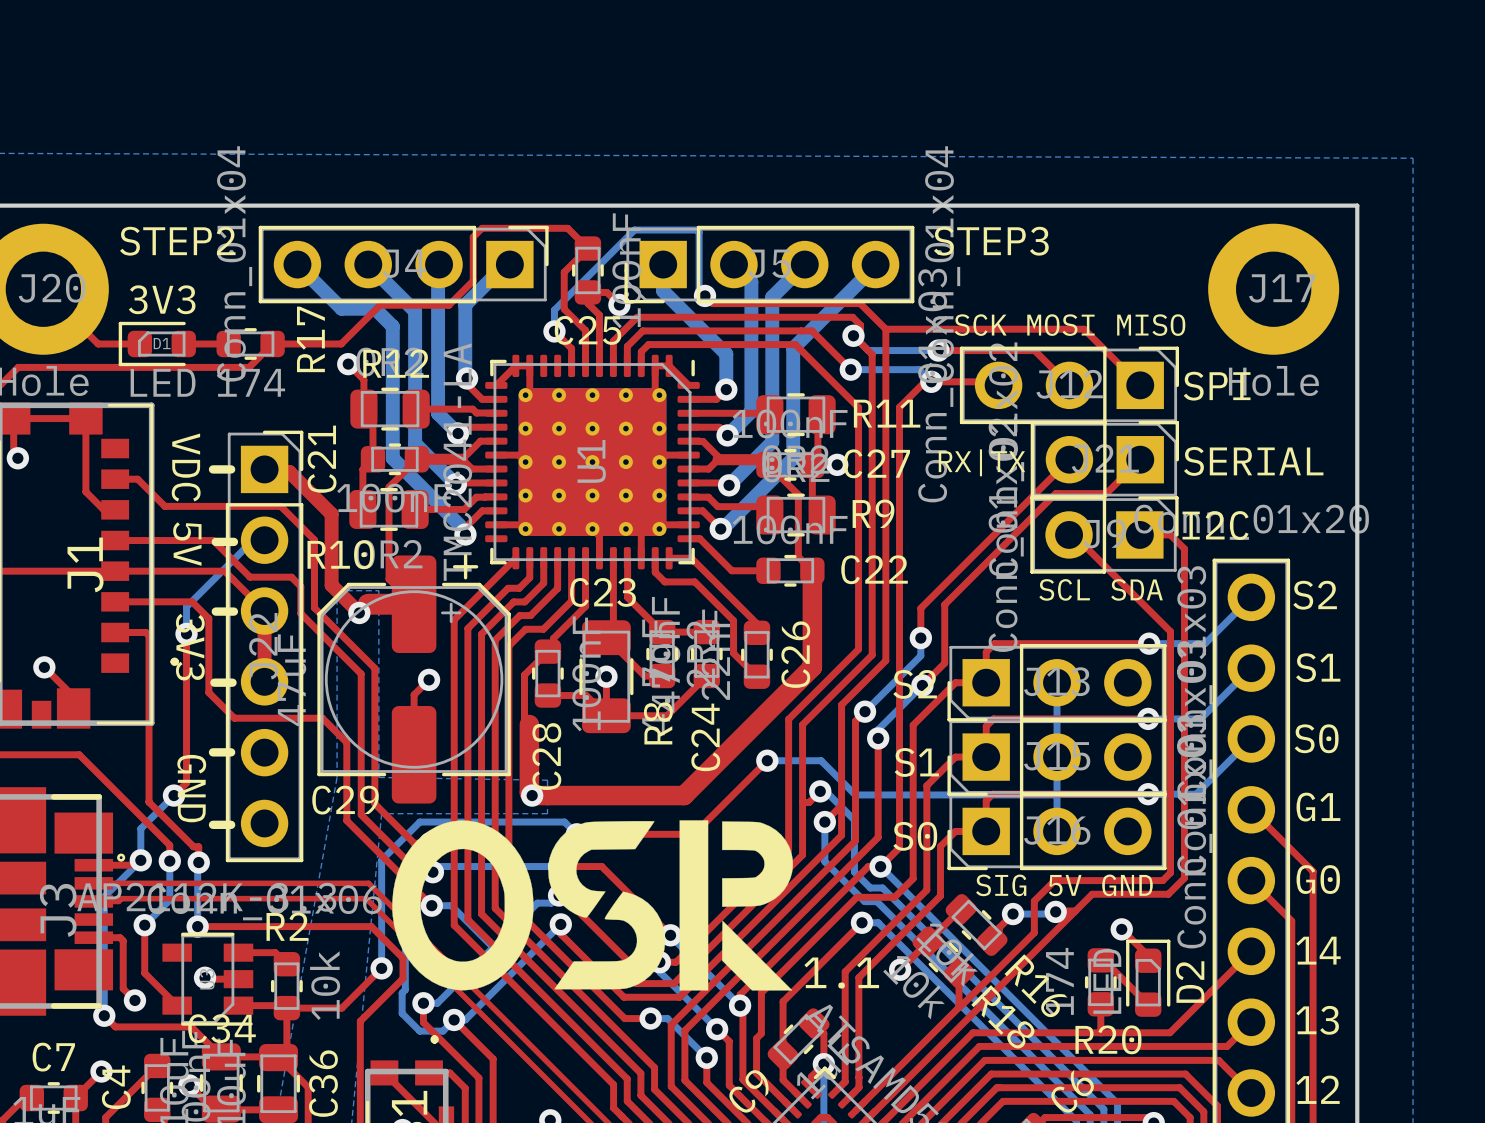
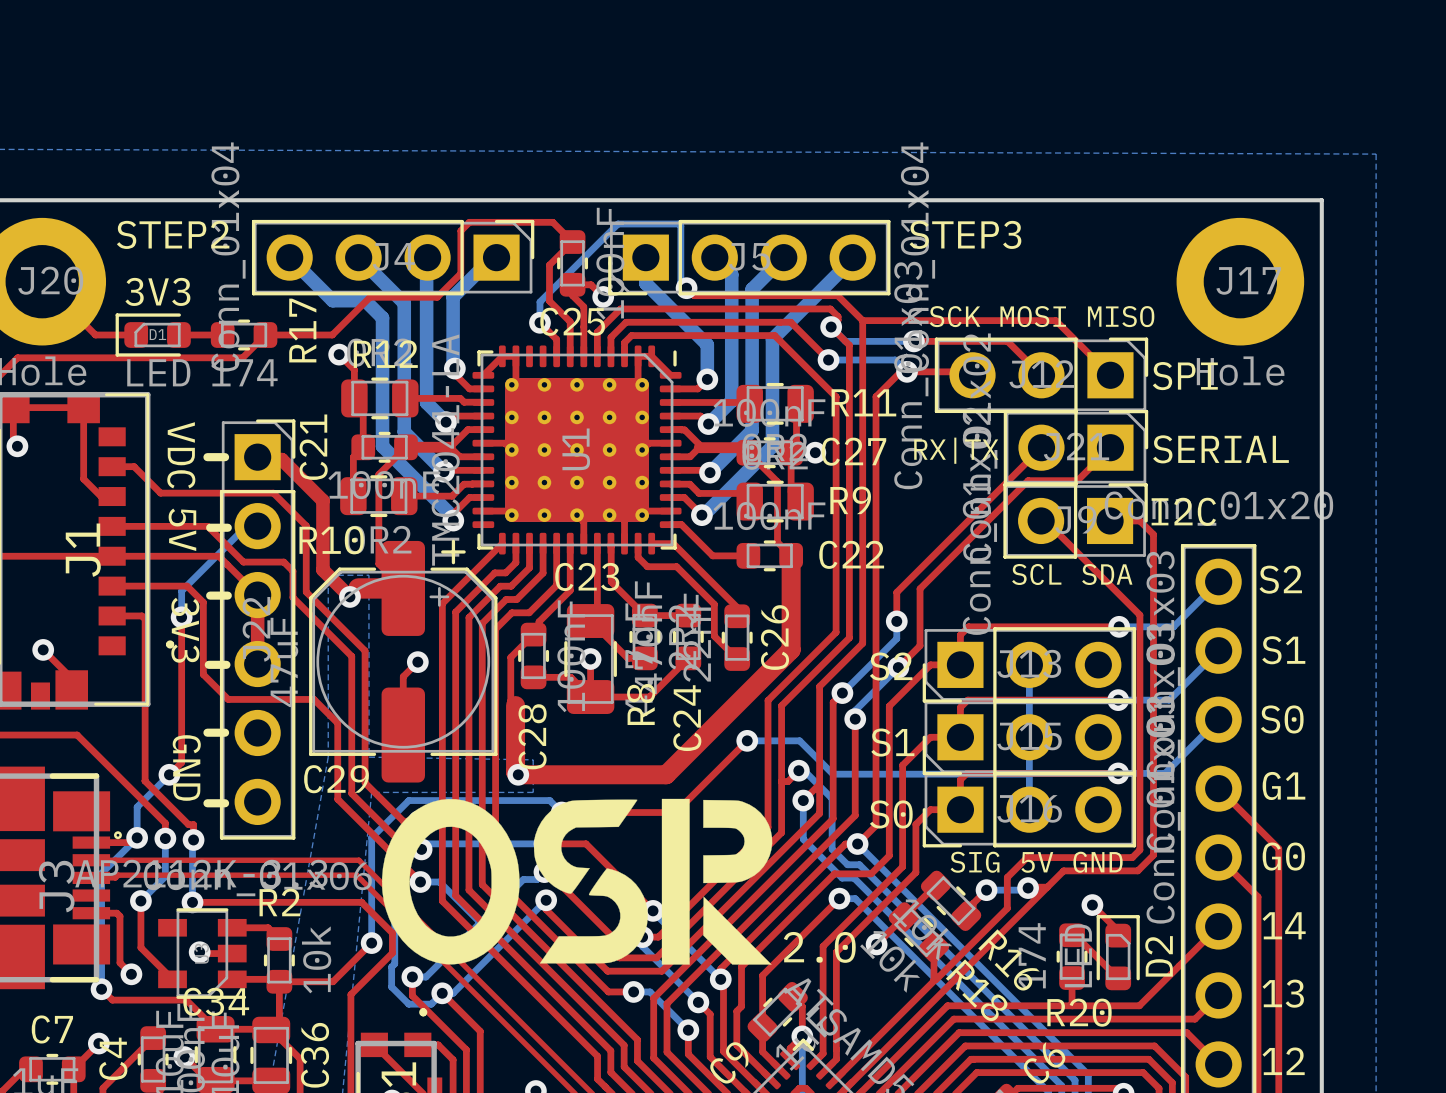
text: 1.1 (841, 973) -> 2.0 (819, 947)

